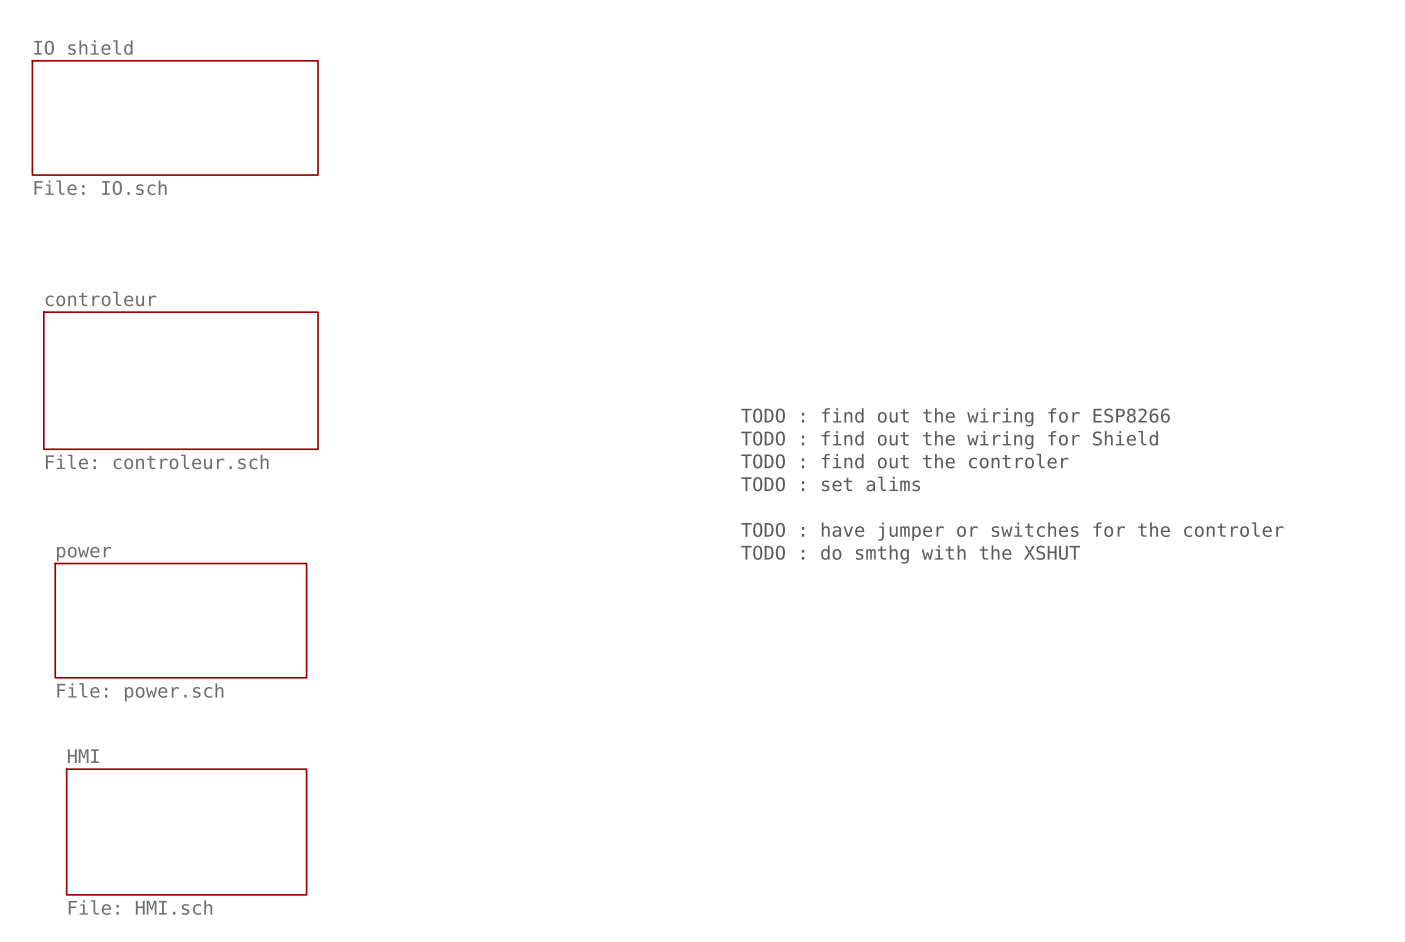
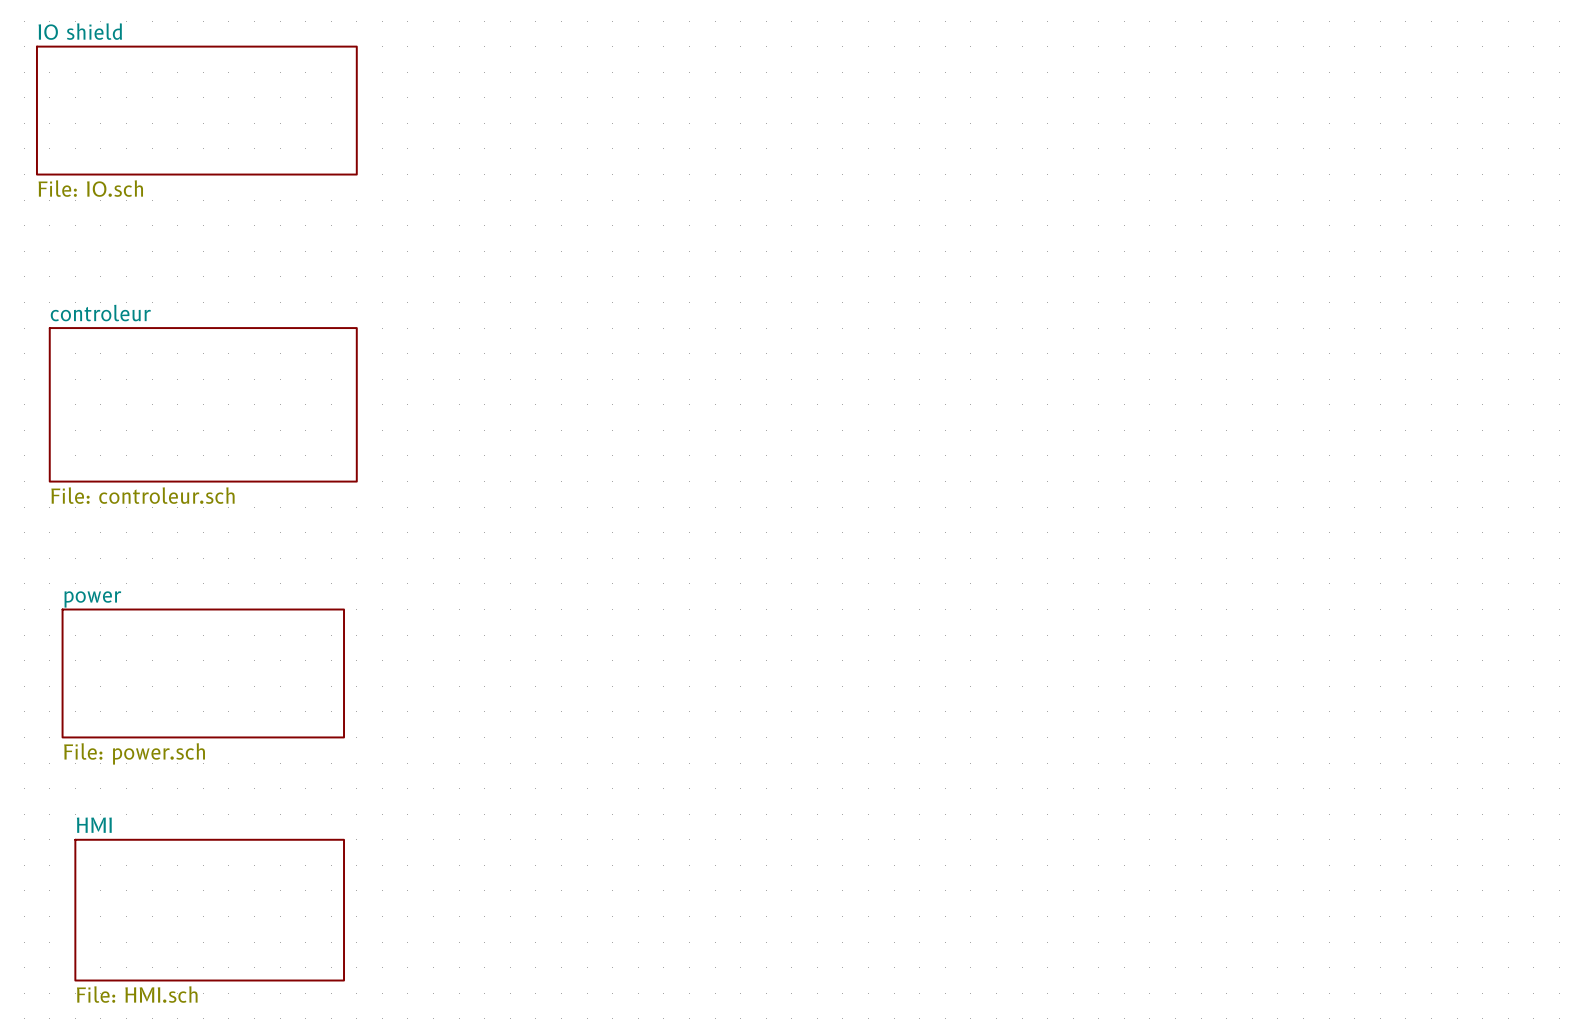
text: TODO : find out the wiring for ESP8266 (955, 417) -> none
text: TODO : find out the wiring for Shield (949, 440) -> none
text: TODO : find out the controler (904, 461) -> none
text: TODO : set alims (830, 483) -> none
text: TODO : have jumper or switches for the controler (1012, 531) -> none
text: TODO : do smthg with the XSHUT (910, 554) -> none

